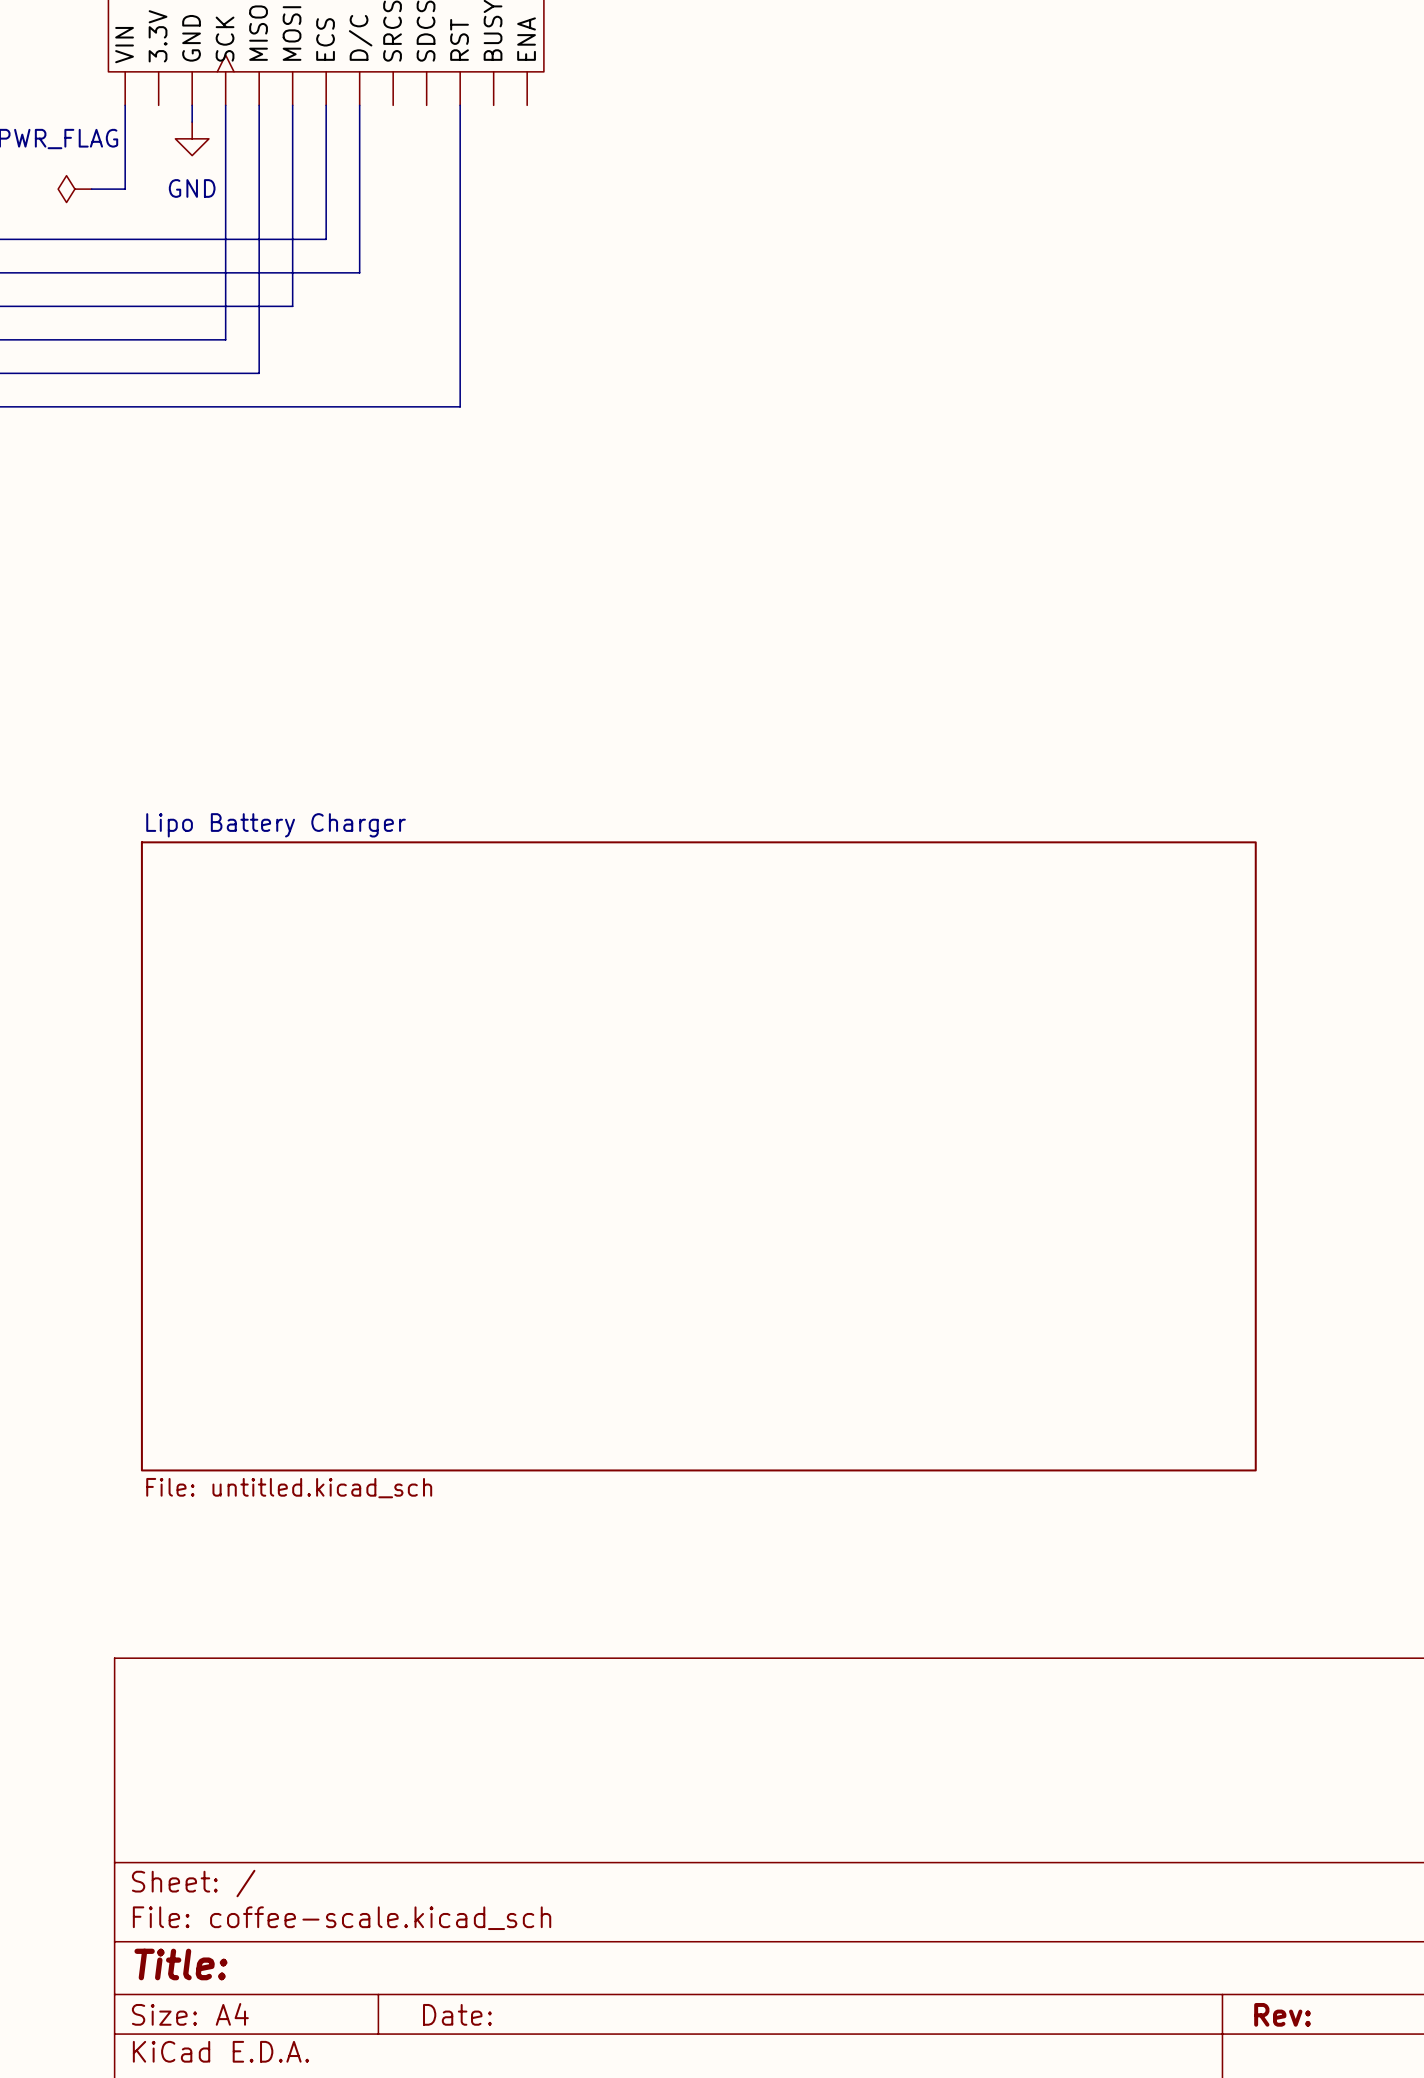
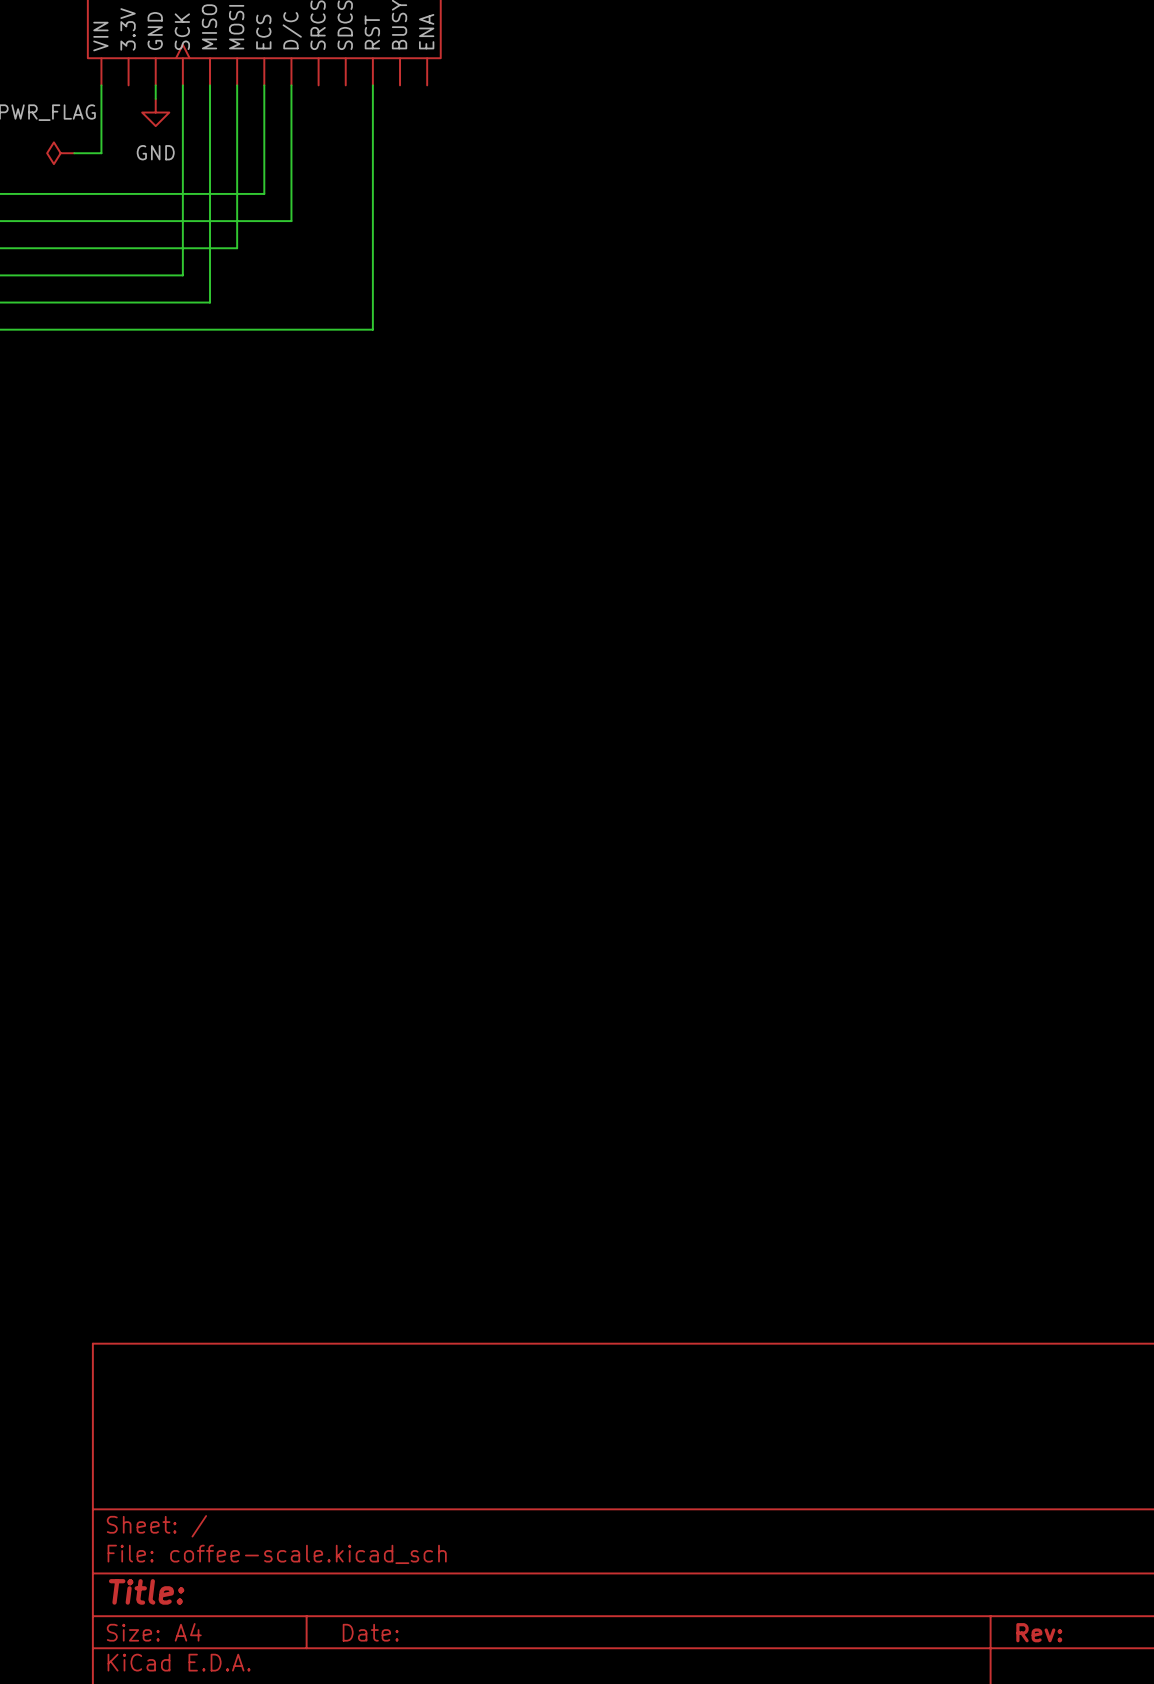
sheet Lipo Battery Charger: File: untitled.kicad_sch (698, 1156) -> none

